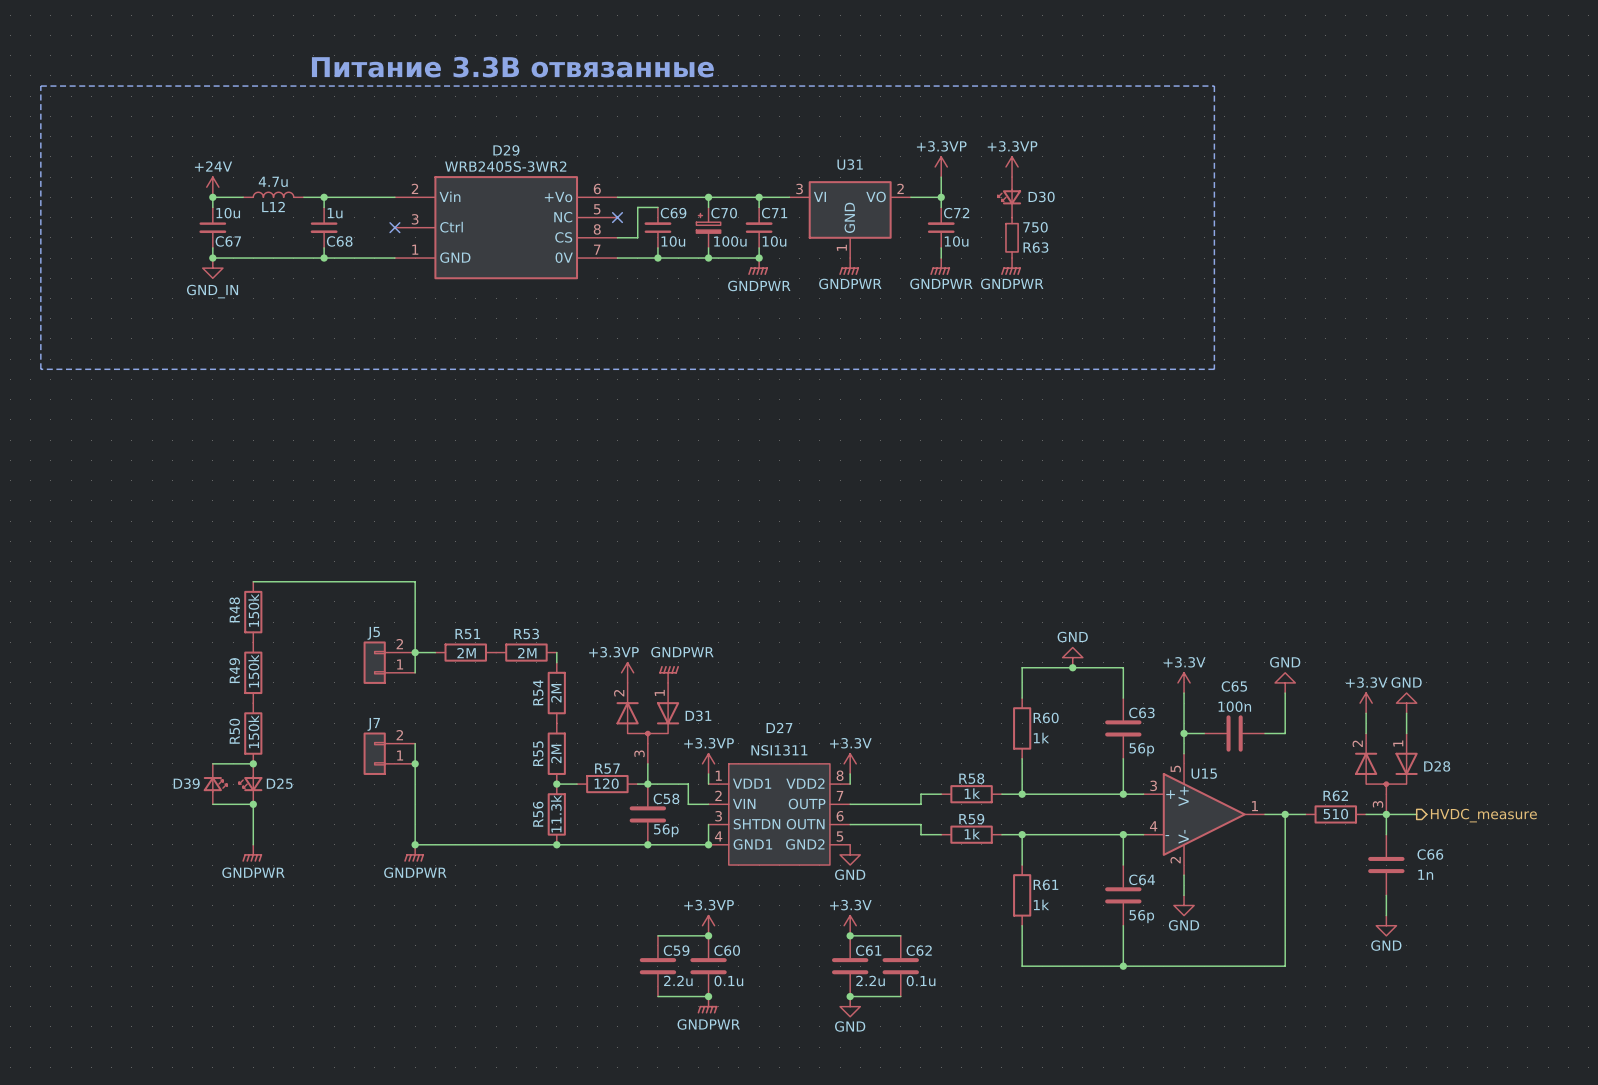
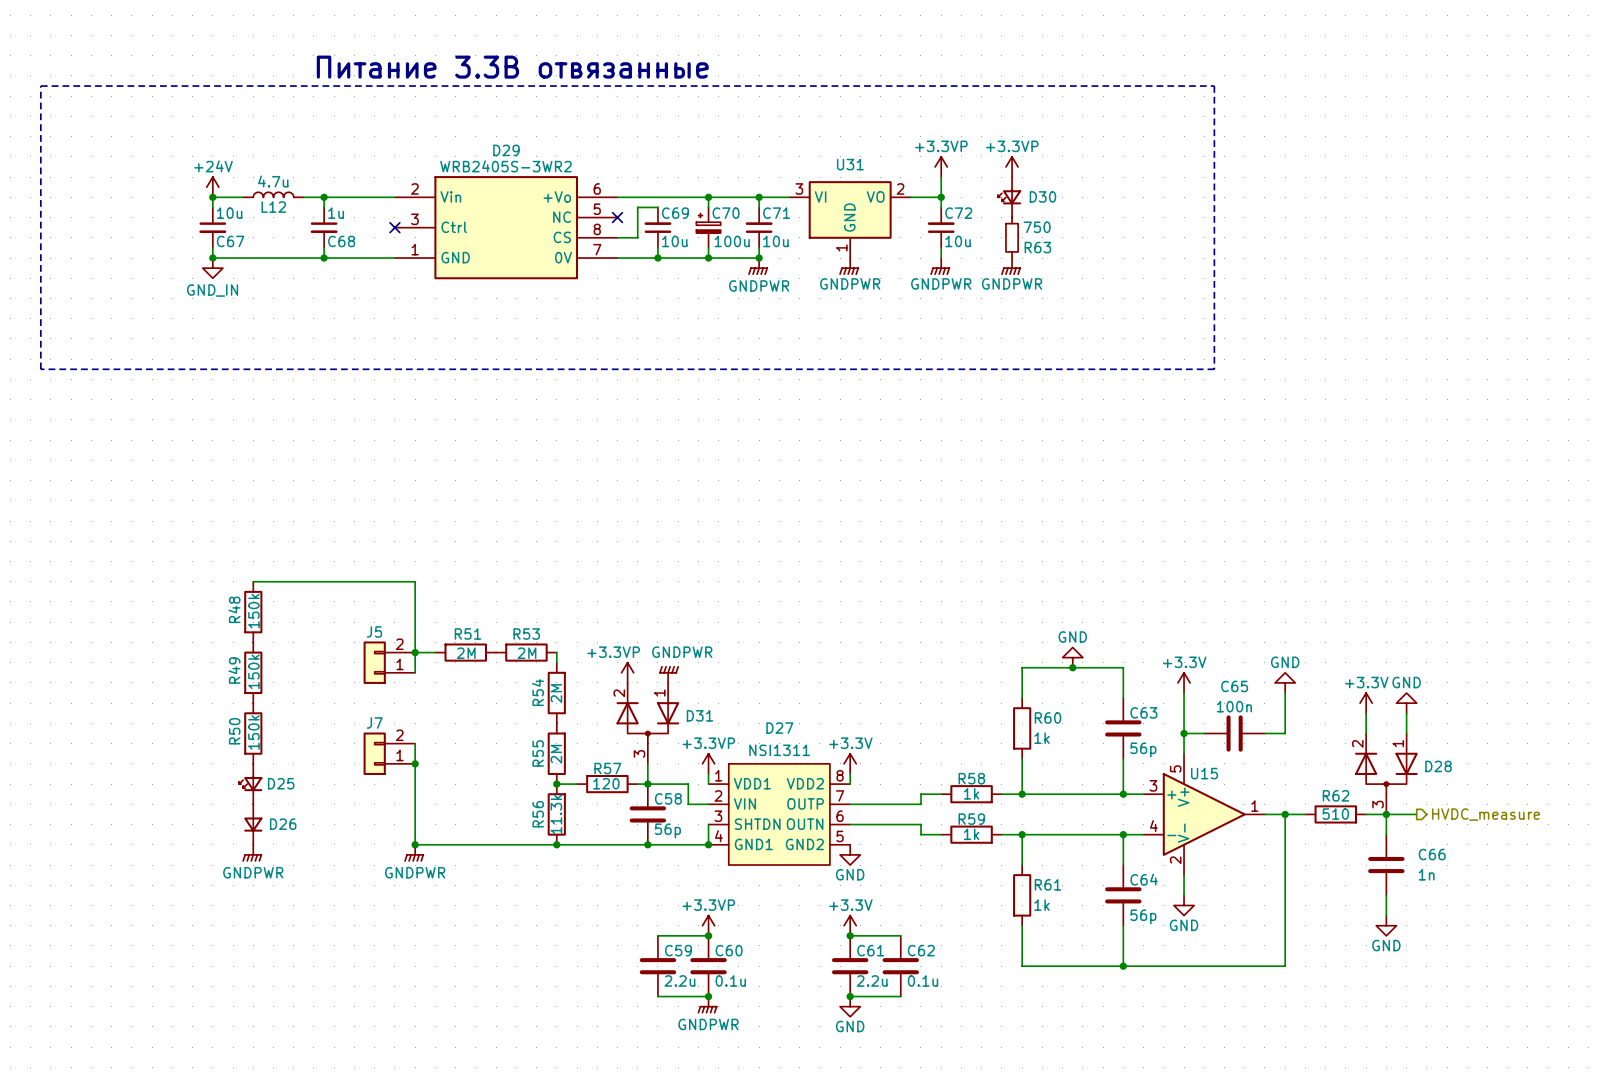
wire: (212, 763) (253, 763) -> none
junction: (253, 763) -> none
D39: (215, 784) -> none
wire: (212, 804) (253, 804) (253, 844) -> none
junction: (253, 804) -> none
D26: none -> (253, 824)

